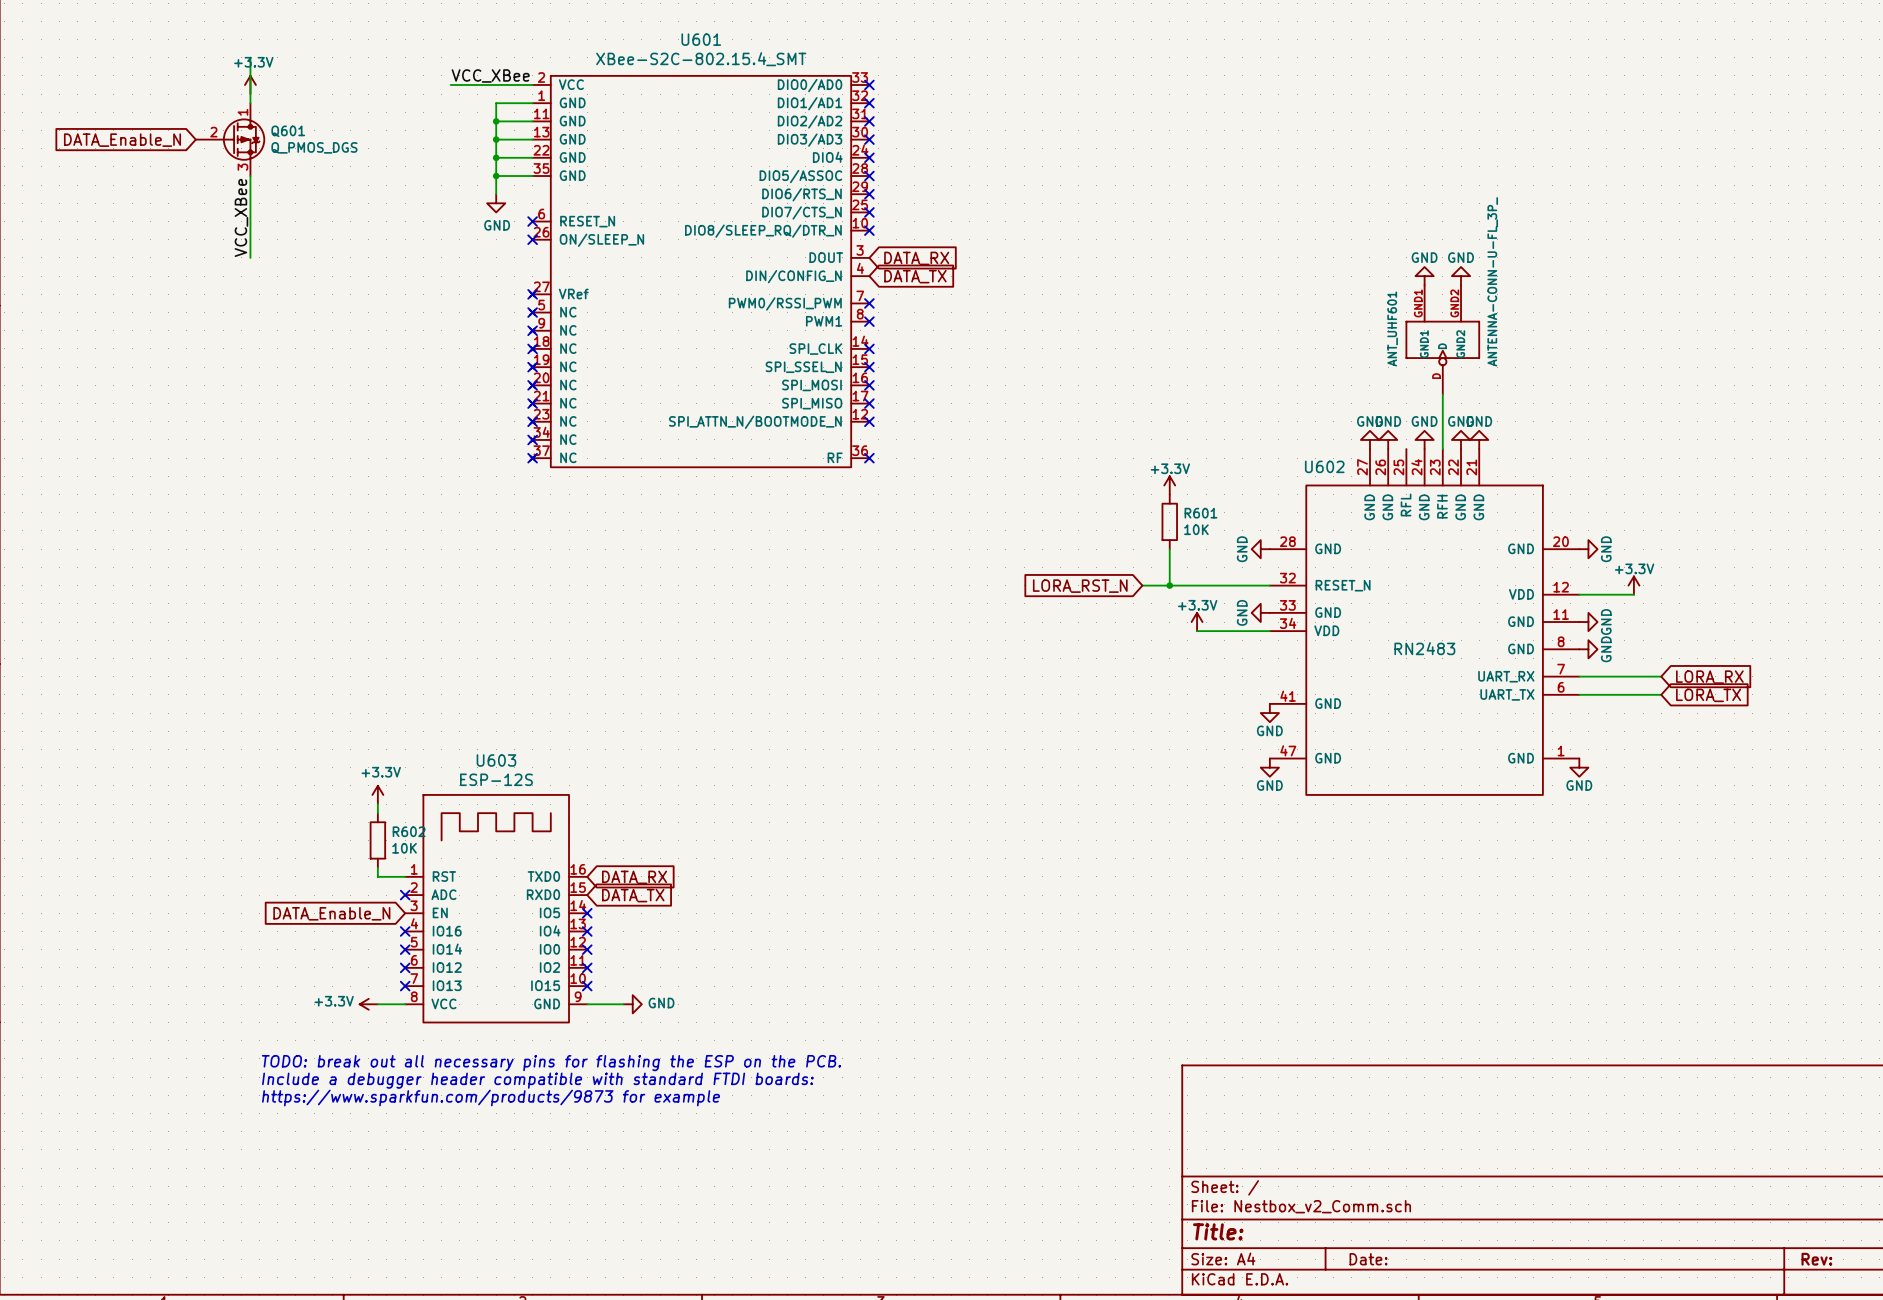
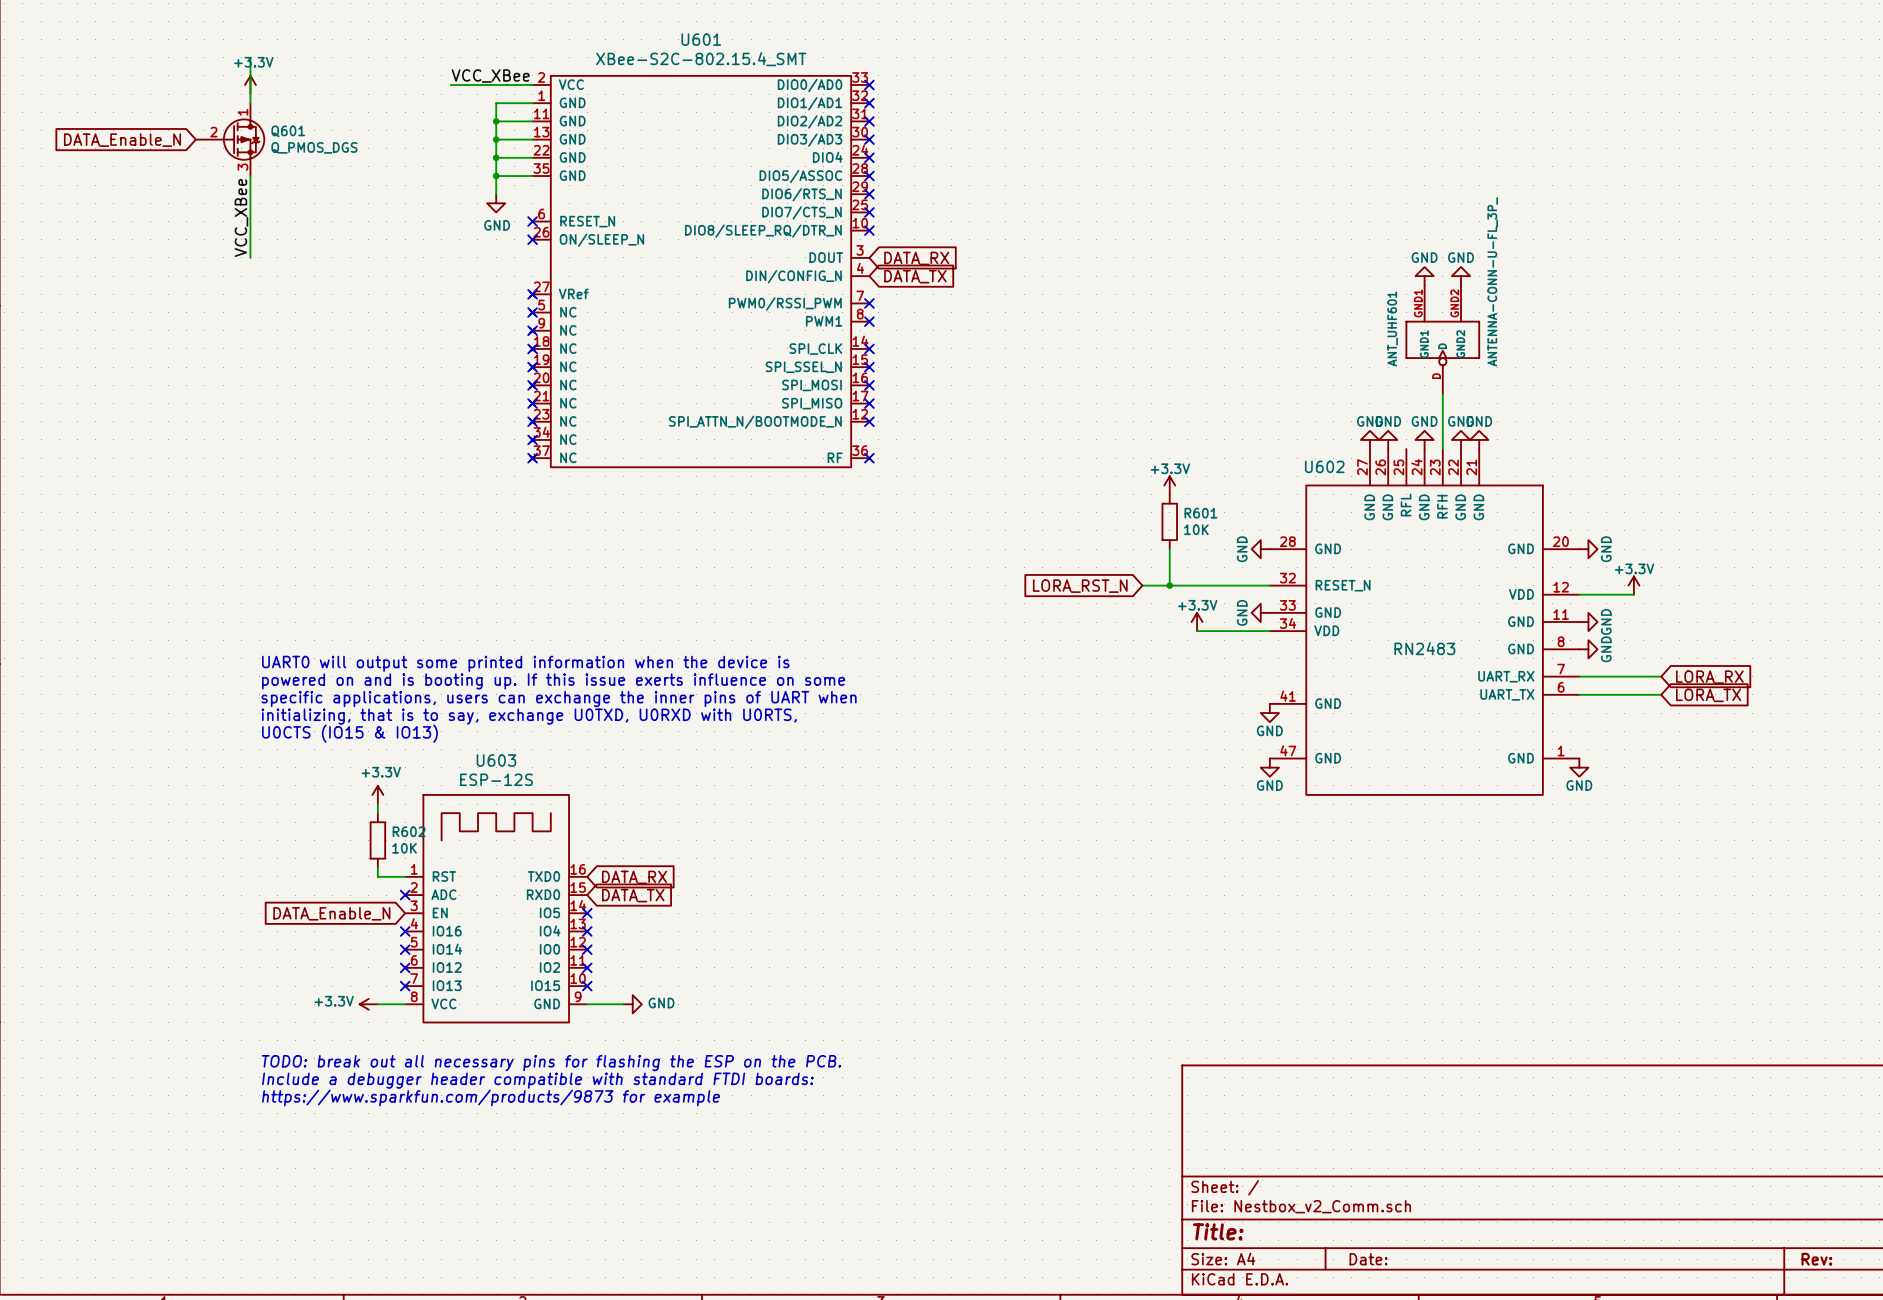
text: none -> UART0 will output some printed information when the device is (525, 663)
text: none -> powered on and is booting up. If this issue exerts influence on some (553, 681)
text: none -> specific applications, users can exchange the inner pins of UART when (559, 699)
text: none -> initializing, that is to say, exchange U0TXD, U0RXD with U0RTS, (529, 716)
text: none -> U0CTS (IO15 & IO13) (349, 733)

